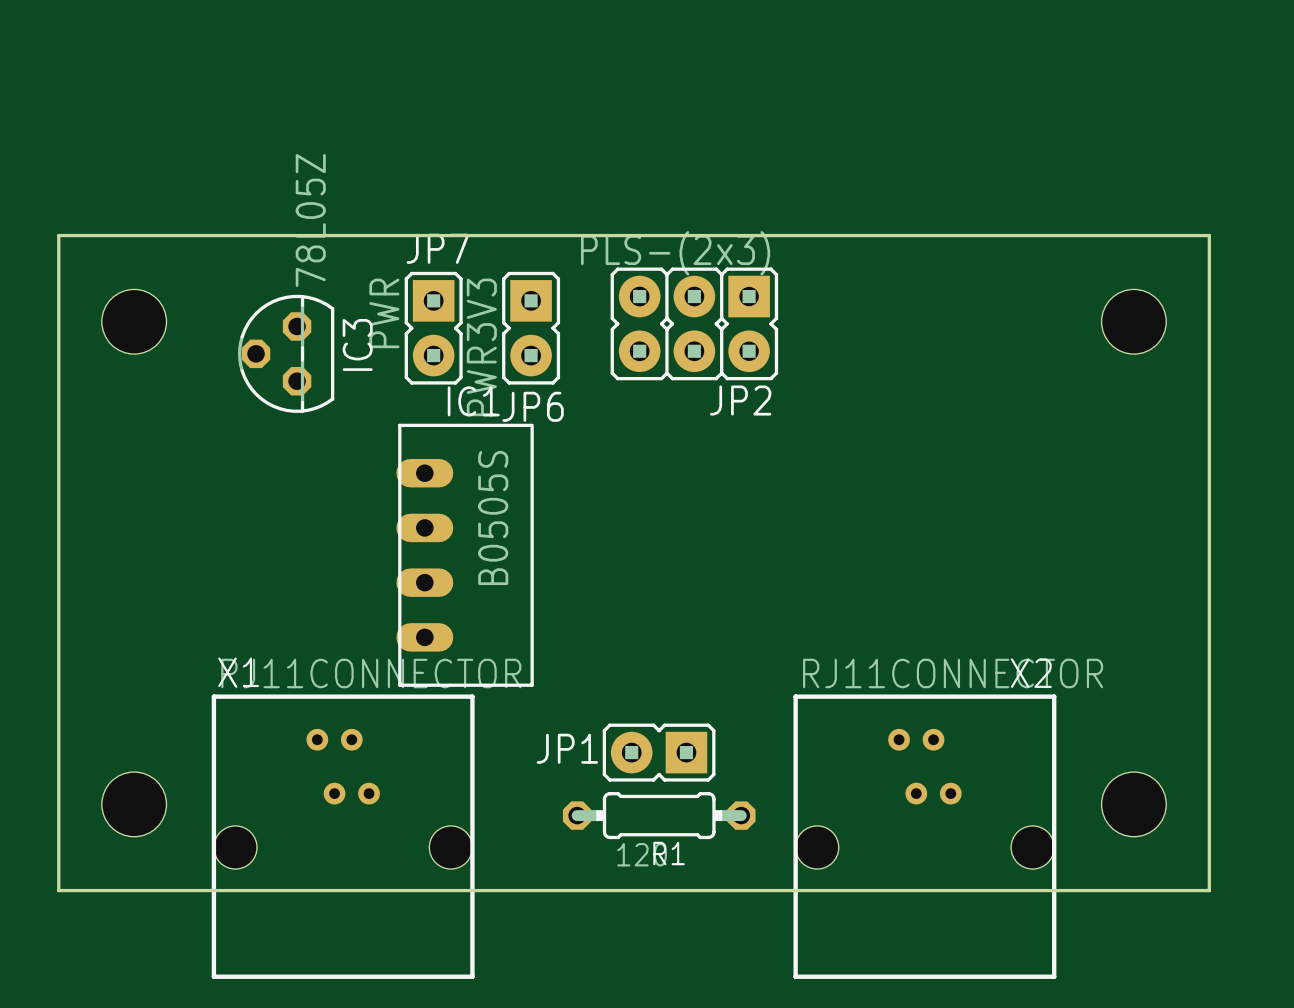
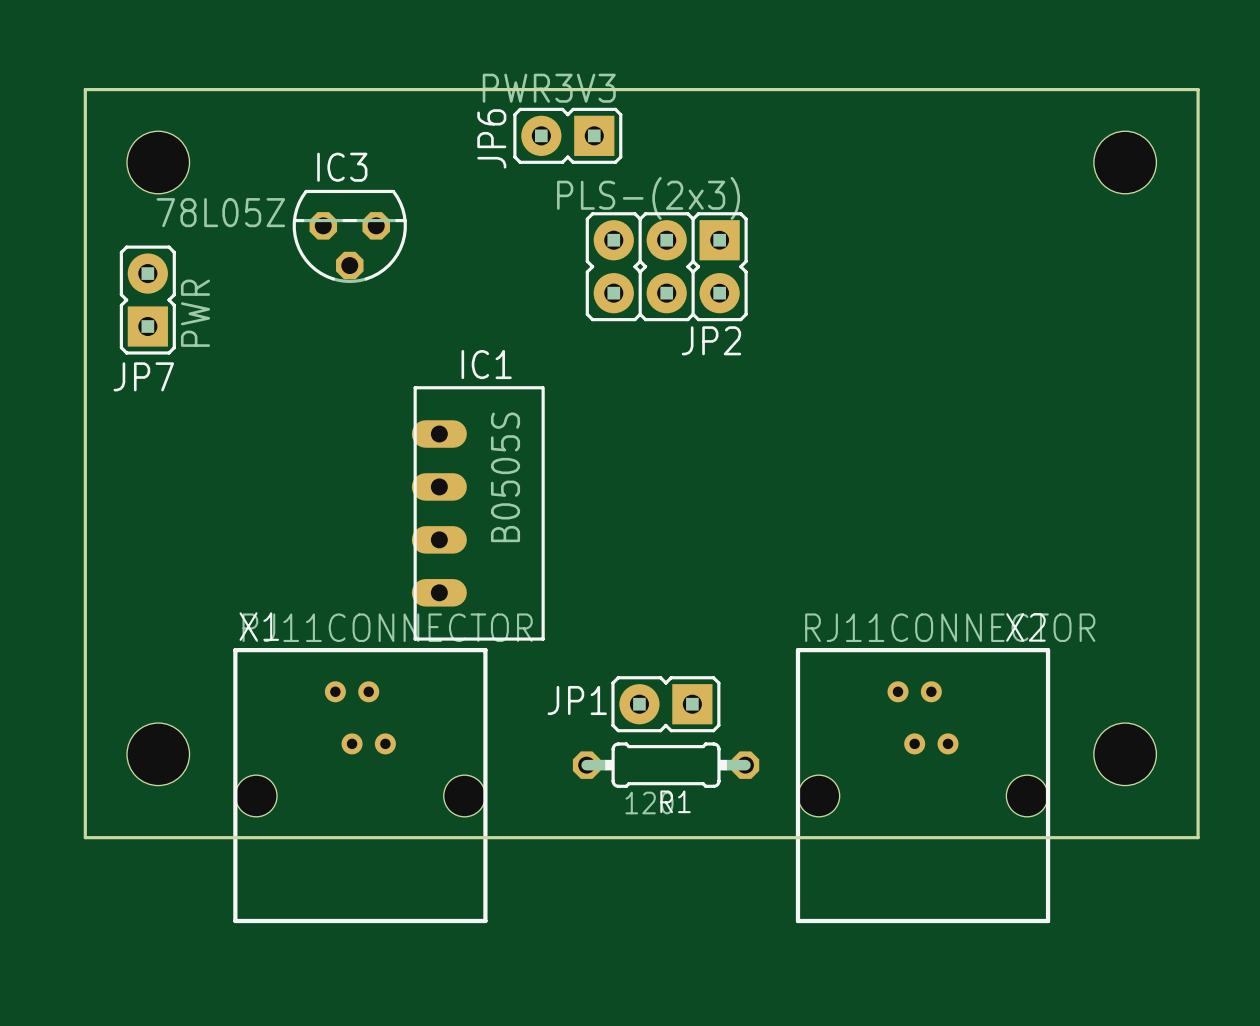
board edge: (58, 235) (1209, 235) -> (85, 204) (85, 89) (1198, 89) (1198, 204)
hole position: (134, 321) -> (158, 162)
hole position: (1133, 321) -> (1125, 162)
JP2 position: (694, 323) -> (666, 266)
JP7 rotation: 0° (433, 328) -> 180° (147, 300)
JP7 position: (433, 328) -> (147, 300)
JP6 rotation: 0° (531, 328) -> 90° clockwise (567, 135)
JP6 position: (531, 328) -> (567, 135)
IC3 rotation: 0° (286, 353) -> 90° counterclockwise (349, 236)
IC3 position: (286, 353) -> (349, 236)

